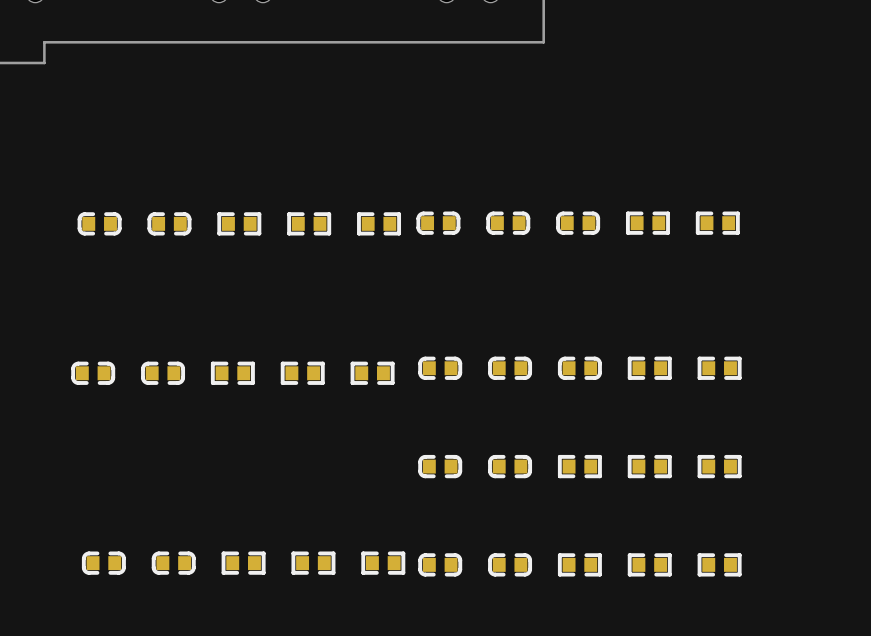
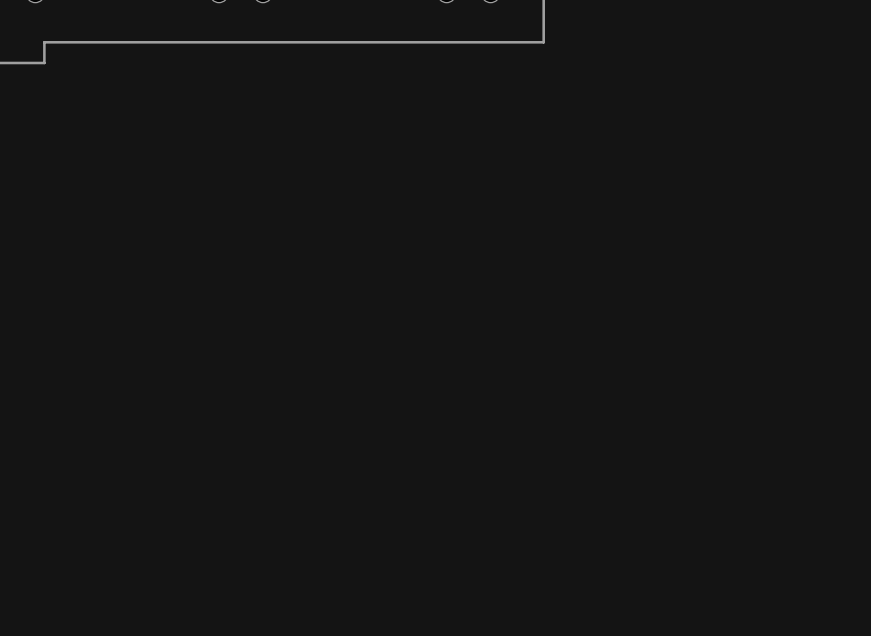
part: (99, 223) -> none
part: (169, 223) -> none
part: (239, 223) -> none
part: (309, 223) -> none
part: (379, 223) -> none
part: (438, 223) -> none
part: (508, 223) -> none
part: (578, 223) -> none
part: (647, 223) -> none
part: (717, 223) -> none
part: (440, 368) -> none
part: (510, 368) -> none
part: (579, 368) -> none
part: (649, 368) -> none
part: (719, 368) -> none
part: (93, 373) -> none
part: (163, 373) -> none
part: (232, 373) -> none
part: (302, 373) -> none
part: (372, 373) -> none
part: (440, 466) -> none
part: (510, 466) -> none
part: (579, 466) -> none
part: (649, 466) -> none
part: (719, 466) -> none
part: (103, 563) -> none
part: (173, 563) -> none
part: (243, 563) -> none
part: (313, 563) -> none
part: (383, 563) -> none
part: (440, 564) -> none
part: (510, 564) -> none
part: (579, 564) -> none
part: (649, 564) -> none
part: (719, 564) -> none

